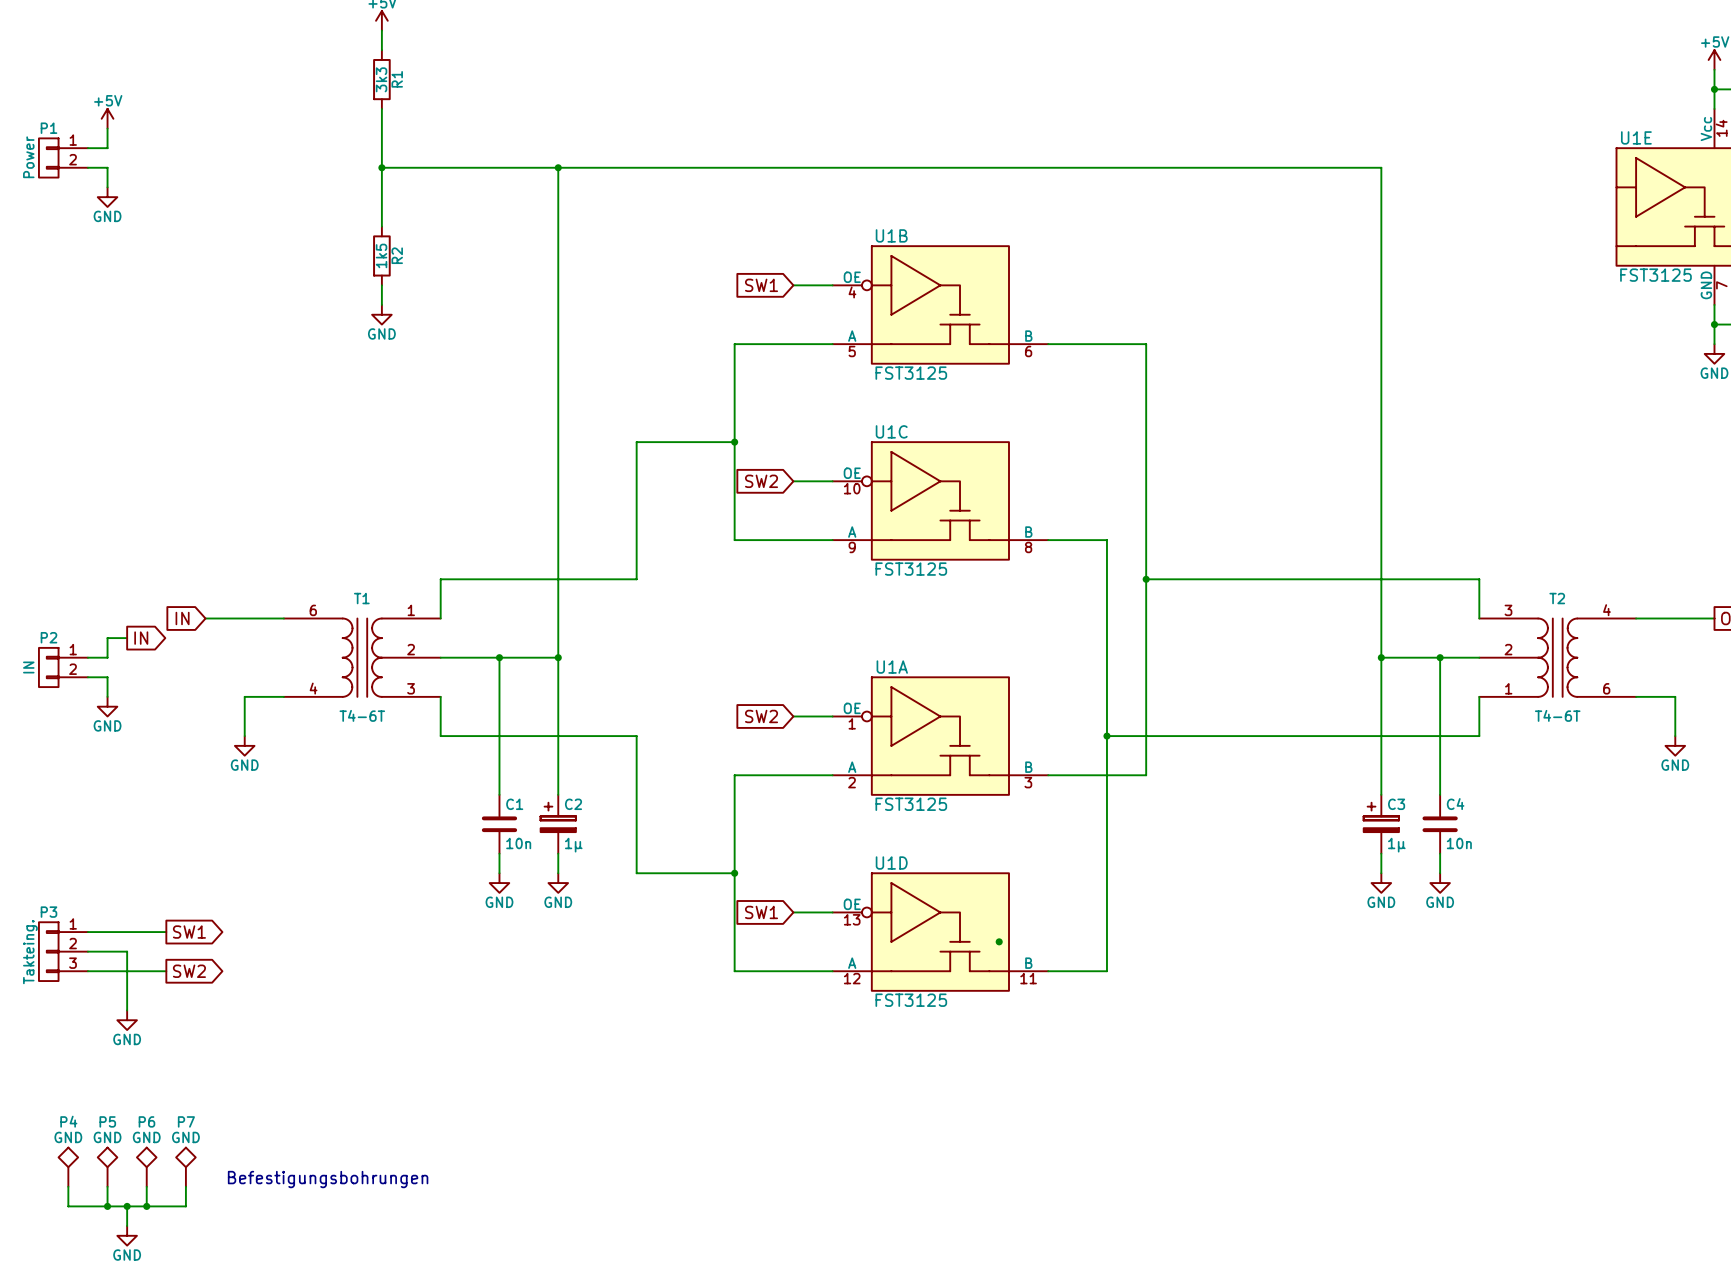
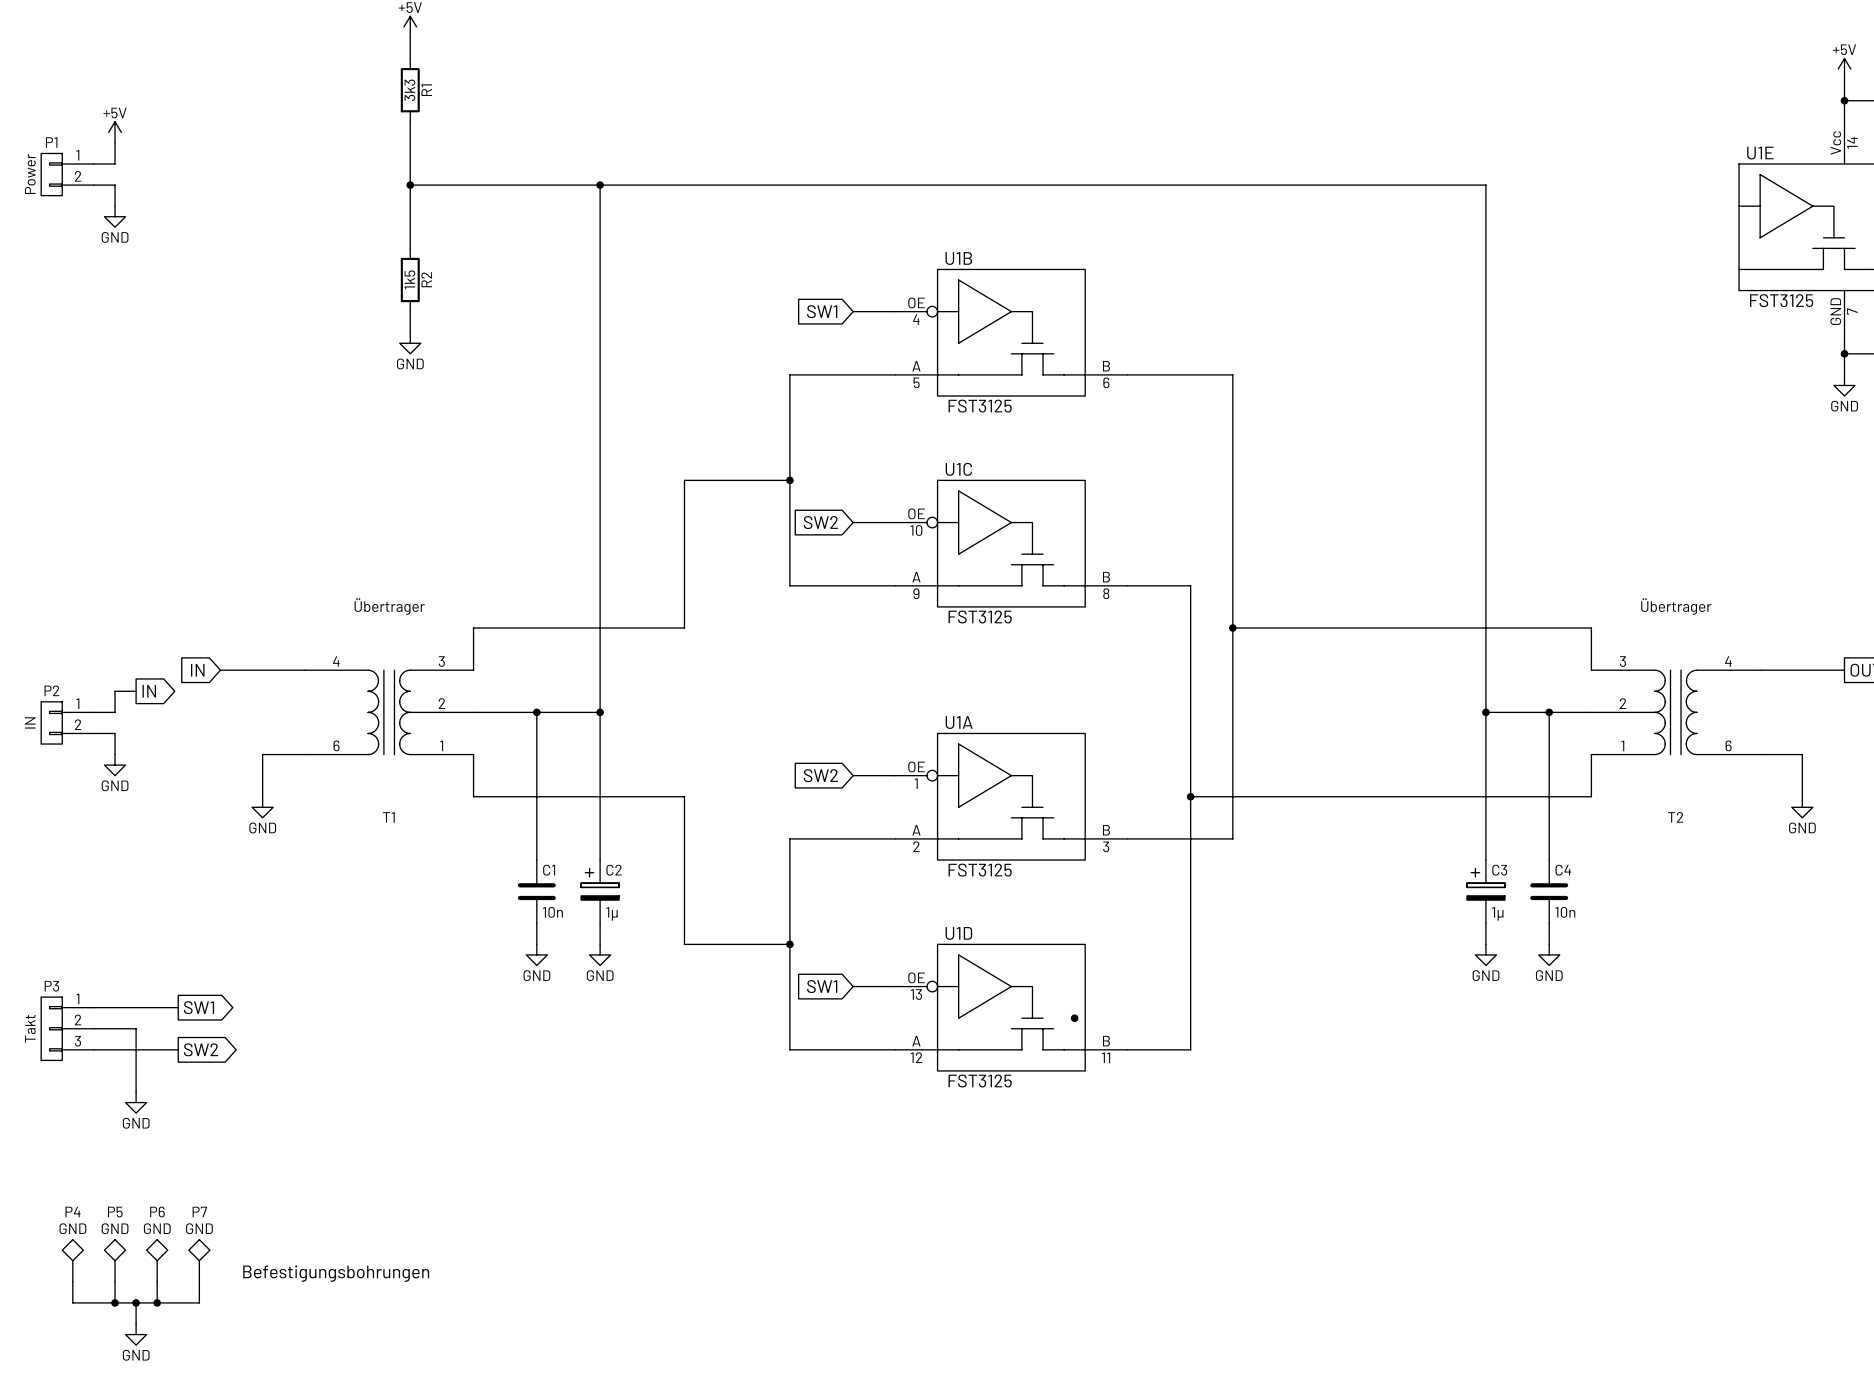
T1 name position: T1 (361, 598) -> T1 (388, 817)
T2 name position: T2 (1557, 598) -> T2 (1675, 817)
T1 flip: as is (362, 657) -> up-down (389, 712)
T1 value: T4-6T (362, 715) -> Übertrager (389, 606)
T2 value: T4-6T (1557, 715) -> Übertrager (1676, 606)
P3 value: Takteing. (30, 952) -> Takt (30, 1028)

